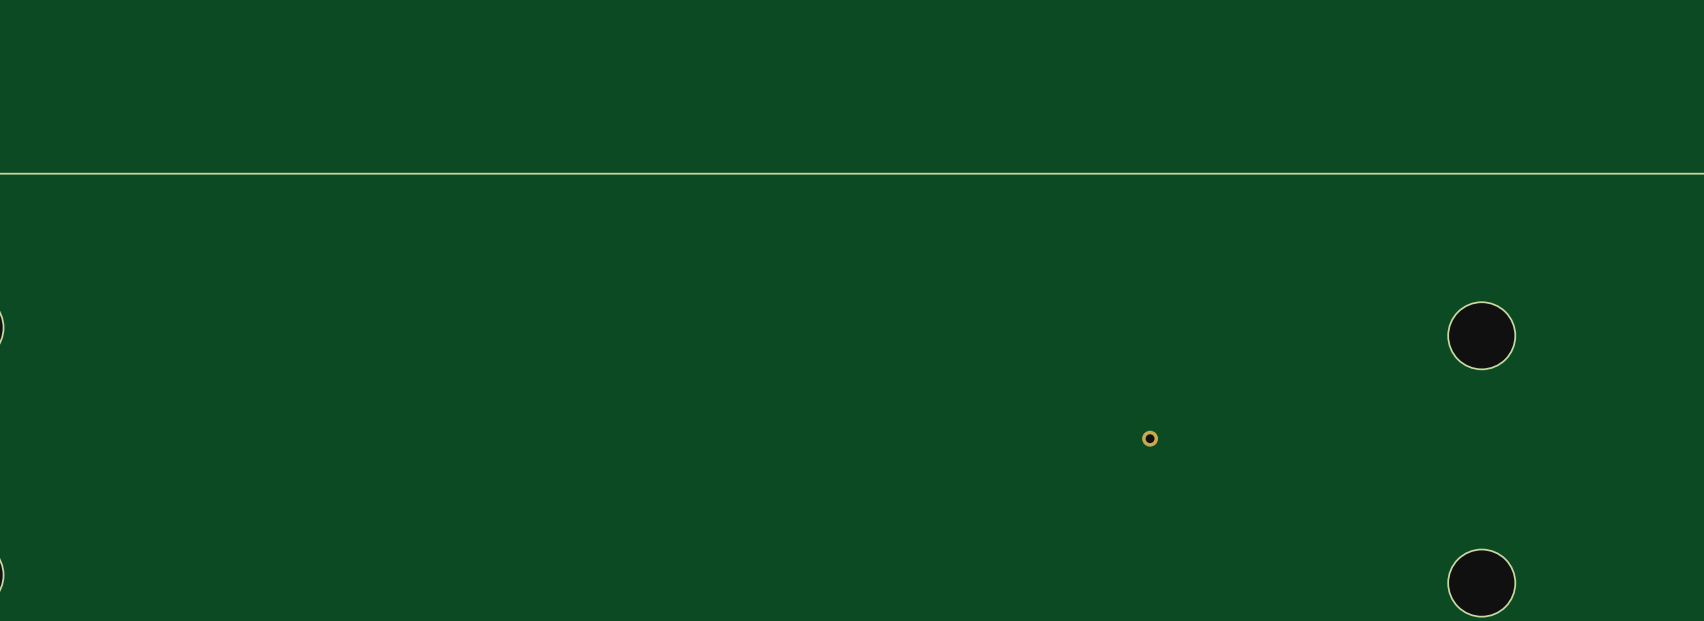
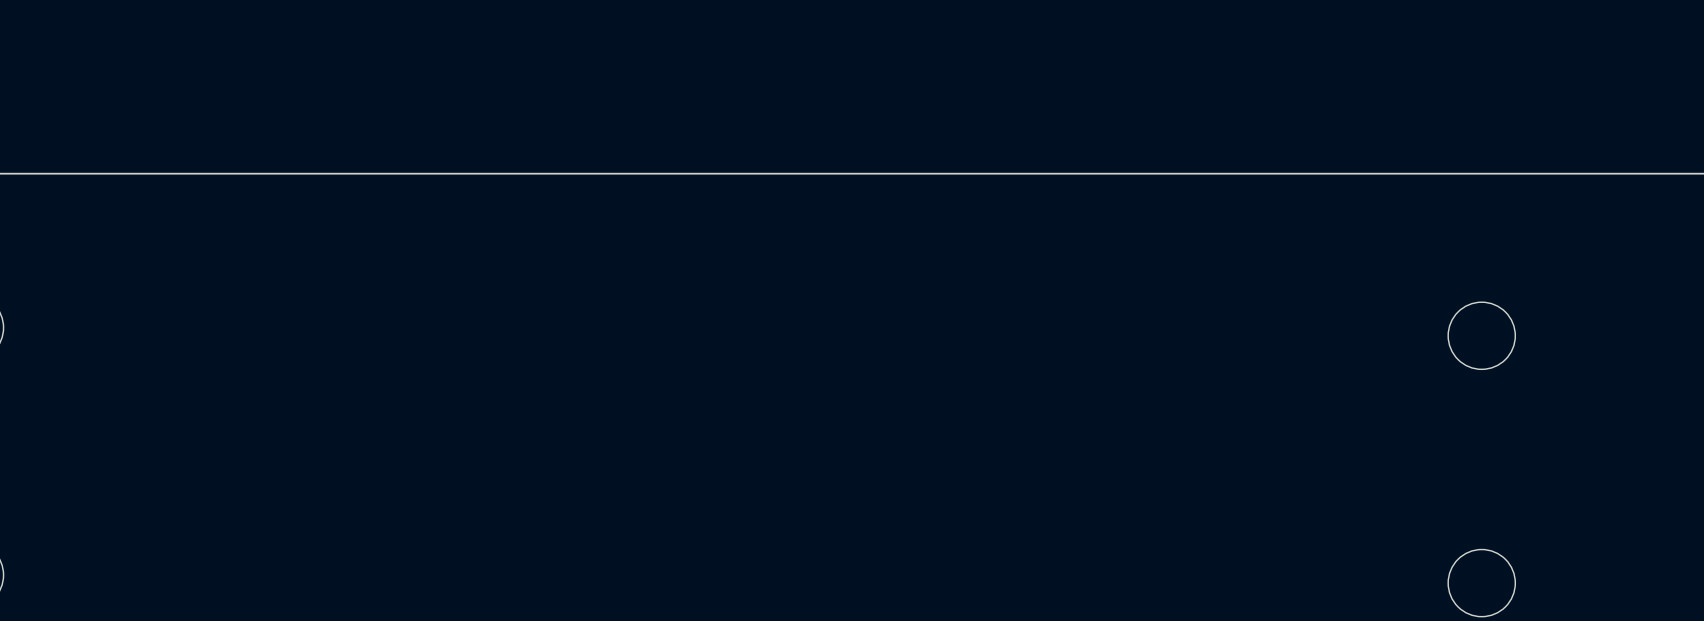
via: (1150, 438) -> none

